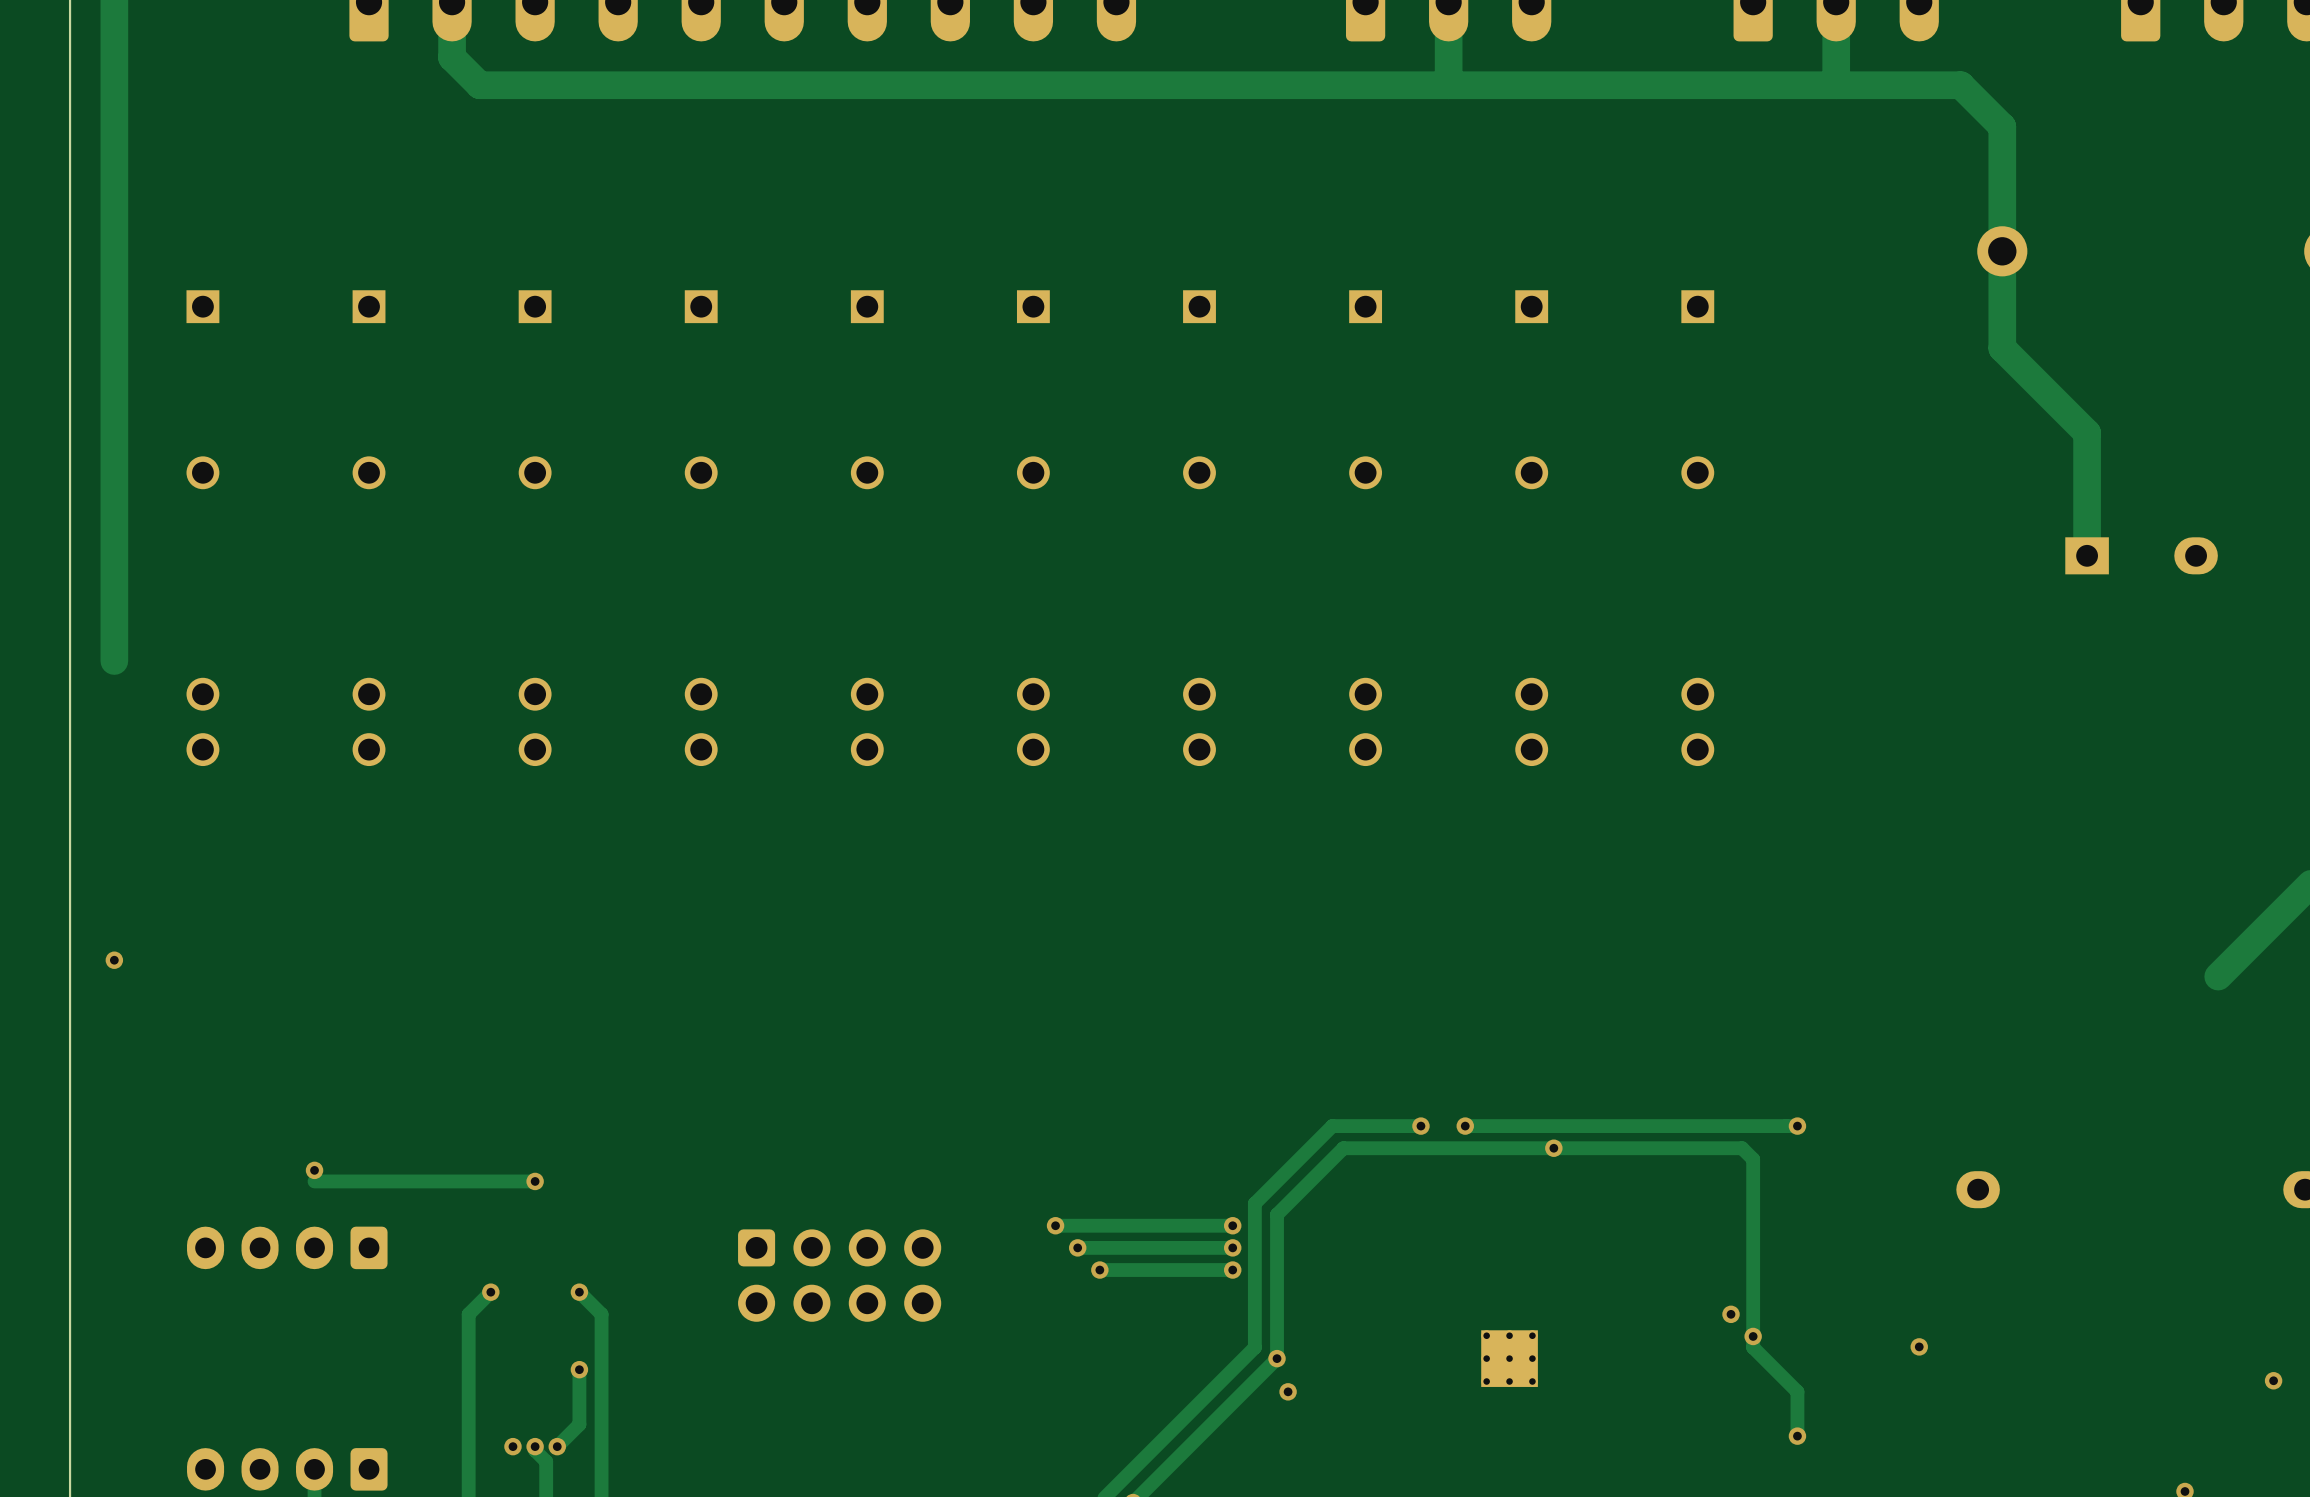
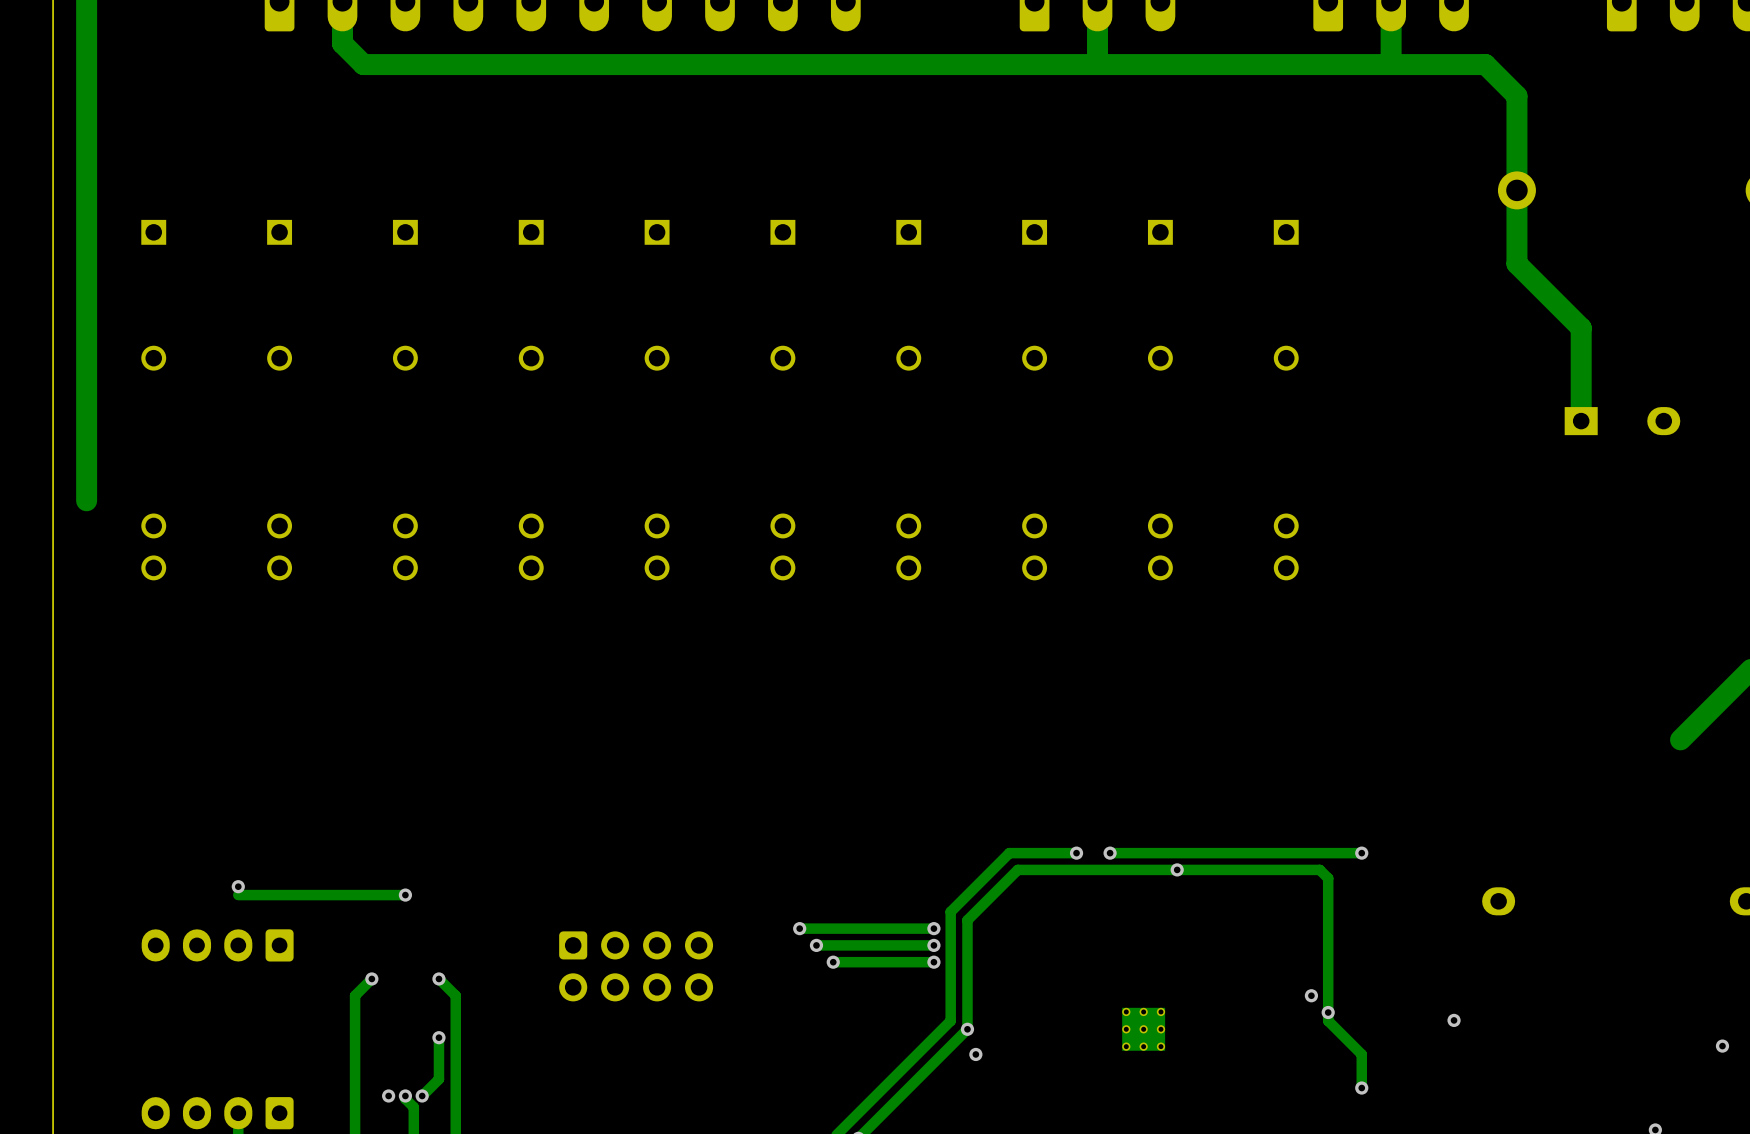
via: (114, 960) -> none

